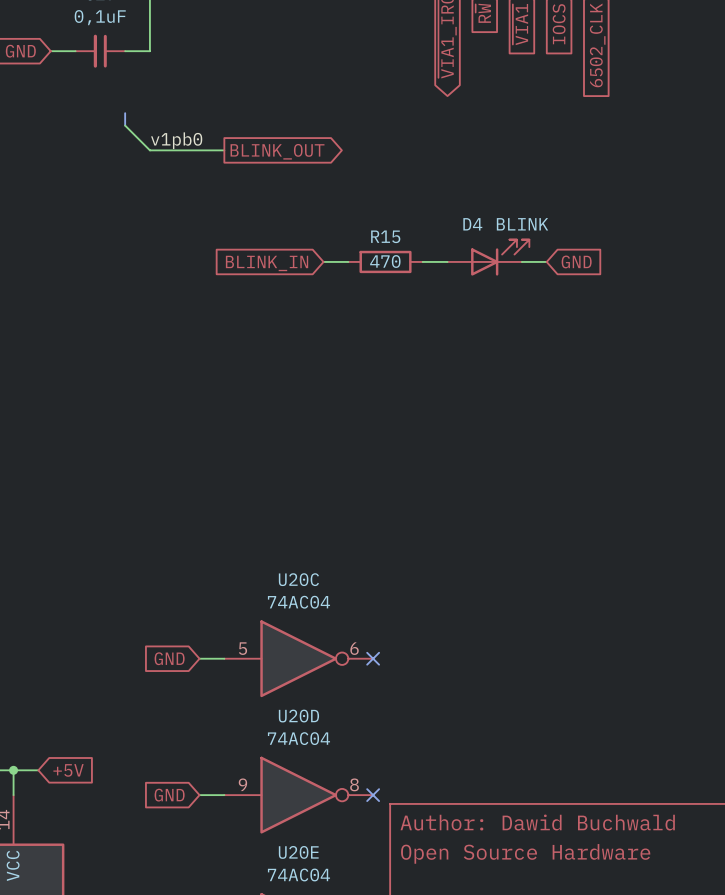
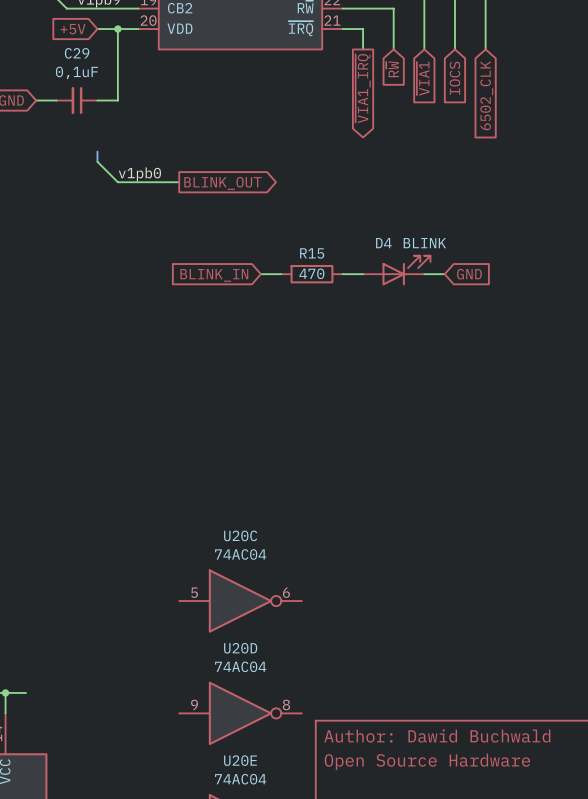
global label: GND (169, 658) -> none
wire: (199, 658) (224, 658) -> none
no-connect mark: (373, 658) -> none
global label: +5V (68, 770) -> none
global label: GND (169, 795) -> none
wire: (199, 795) (224, 795) -> none
no-connect mark: (373, 795) -> none

